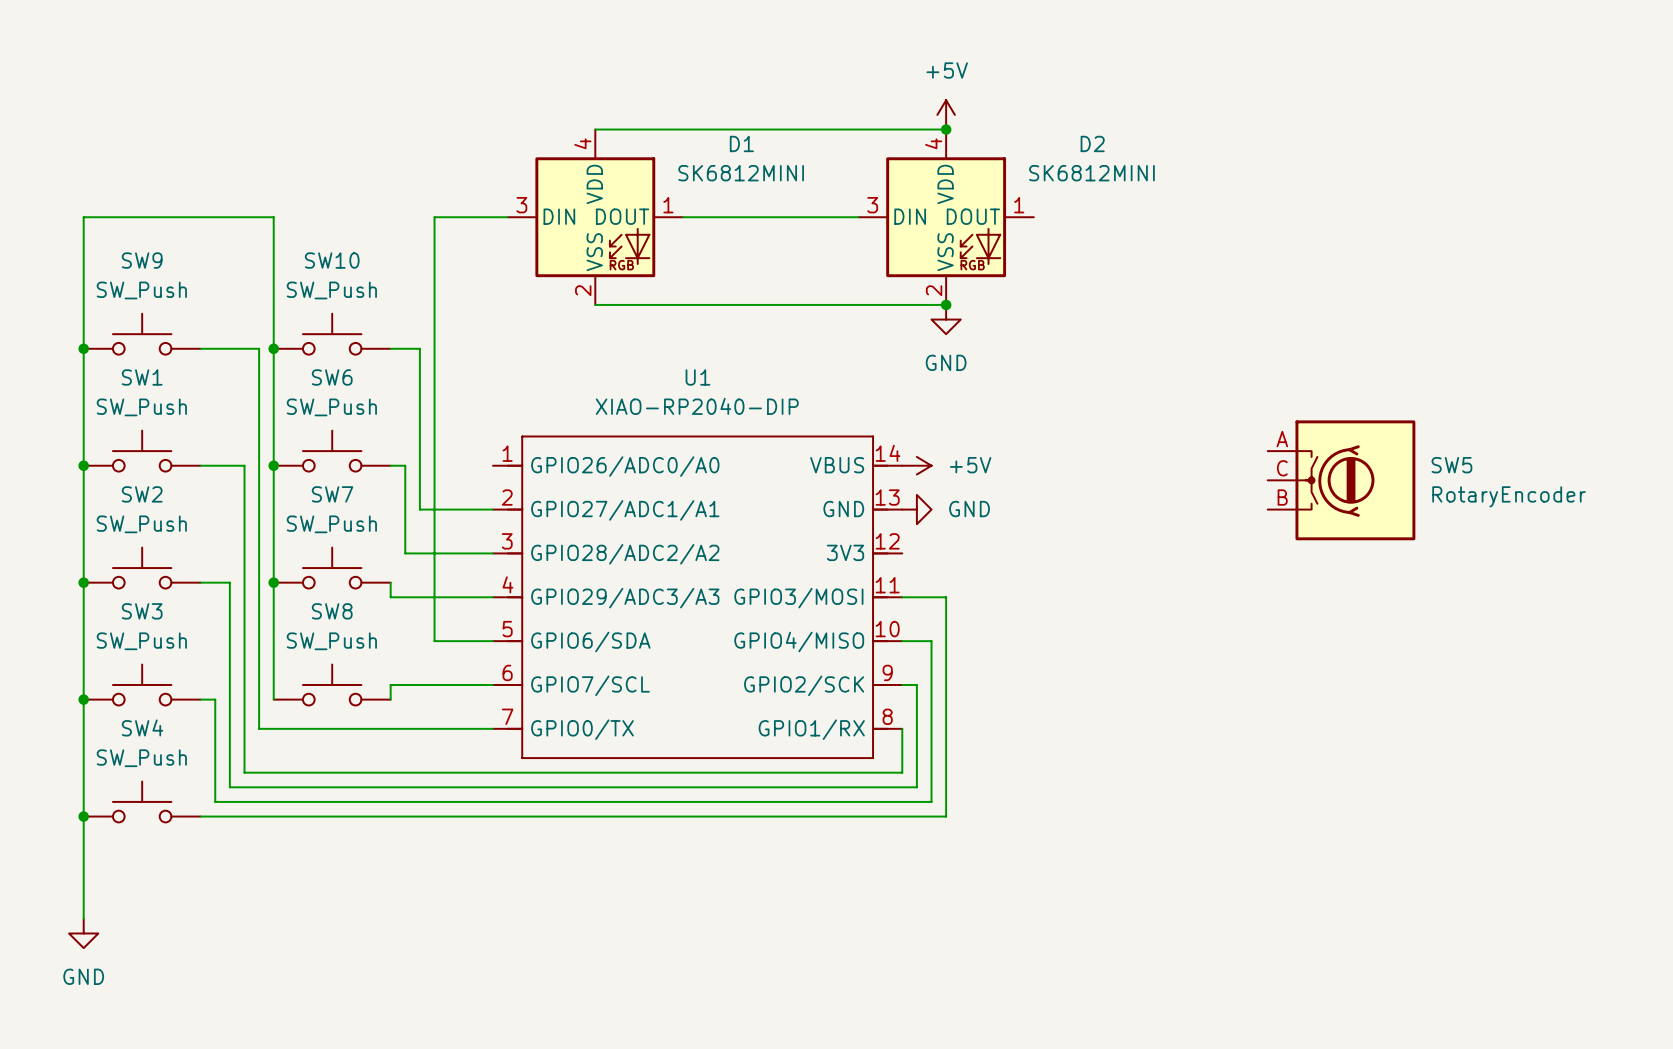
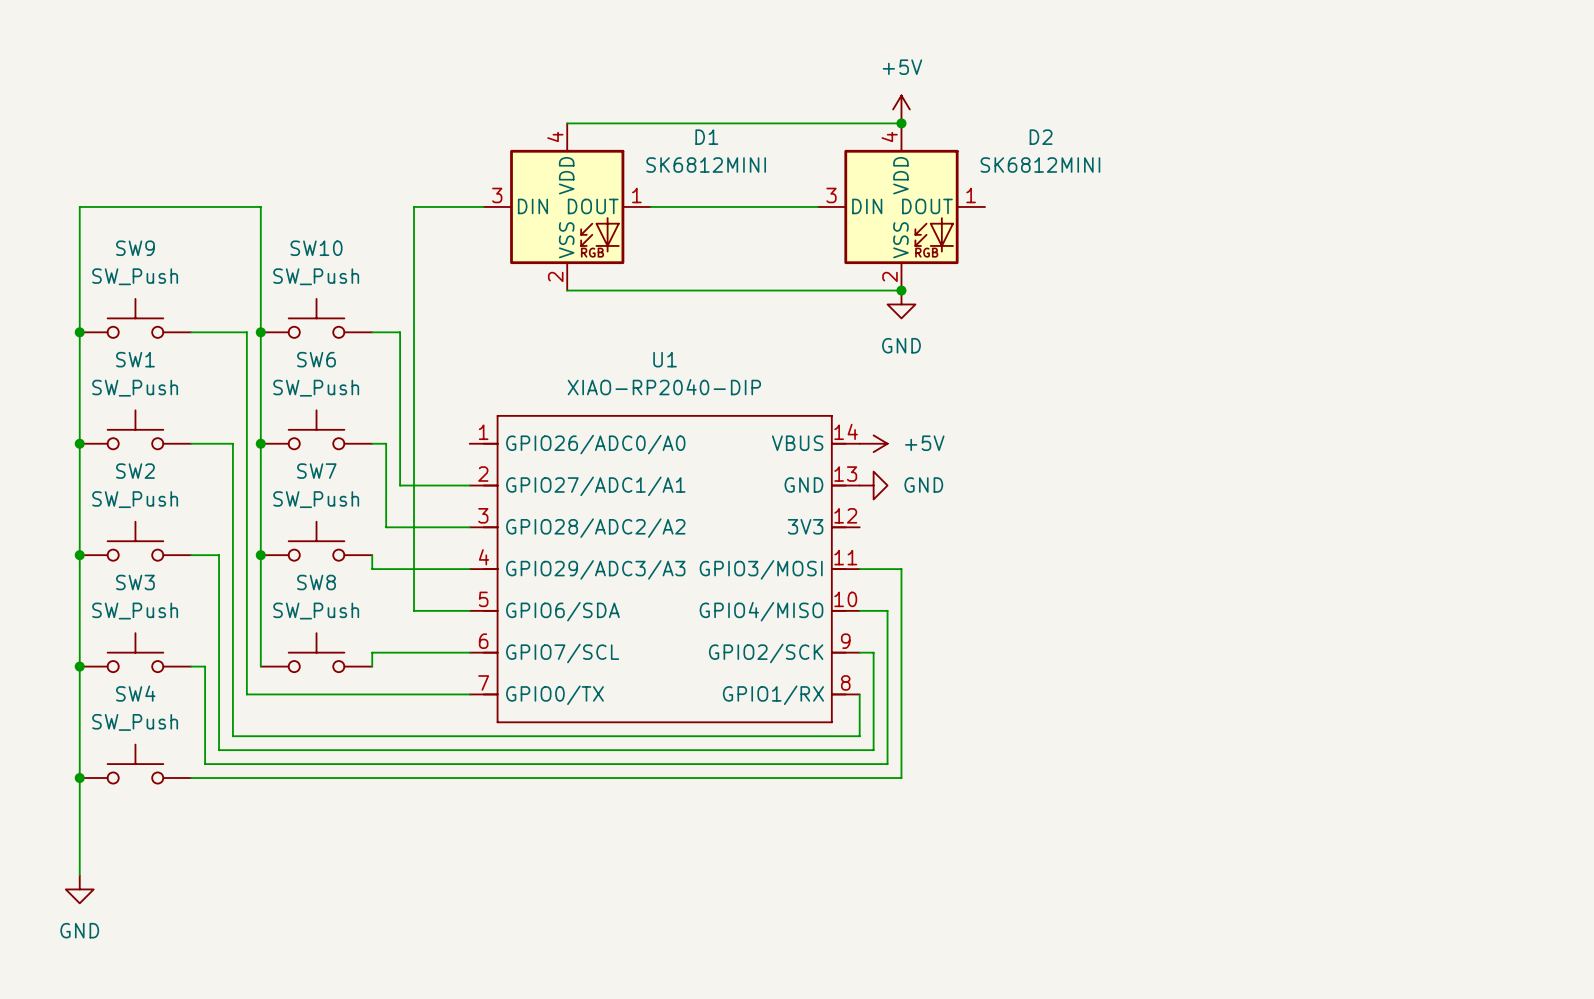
SW5: RotaryEncoder (1341, 480) -> none

